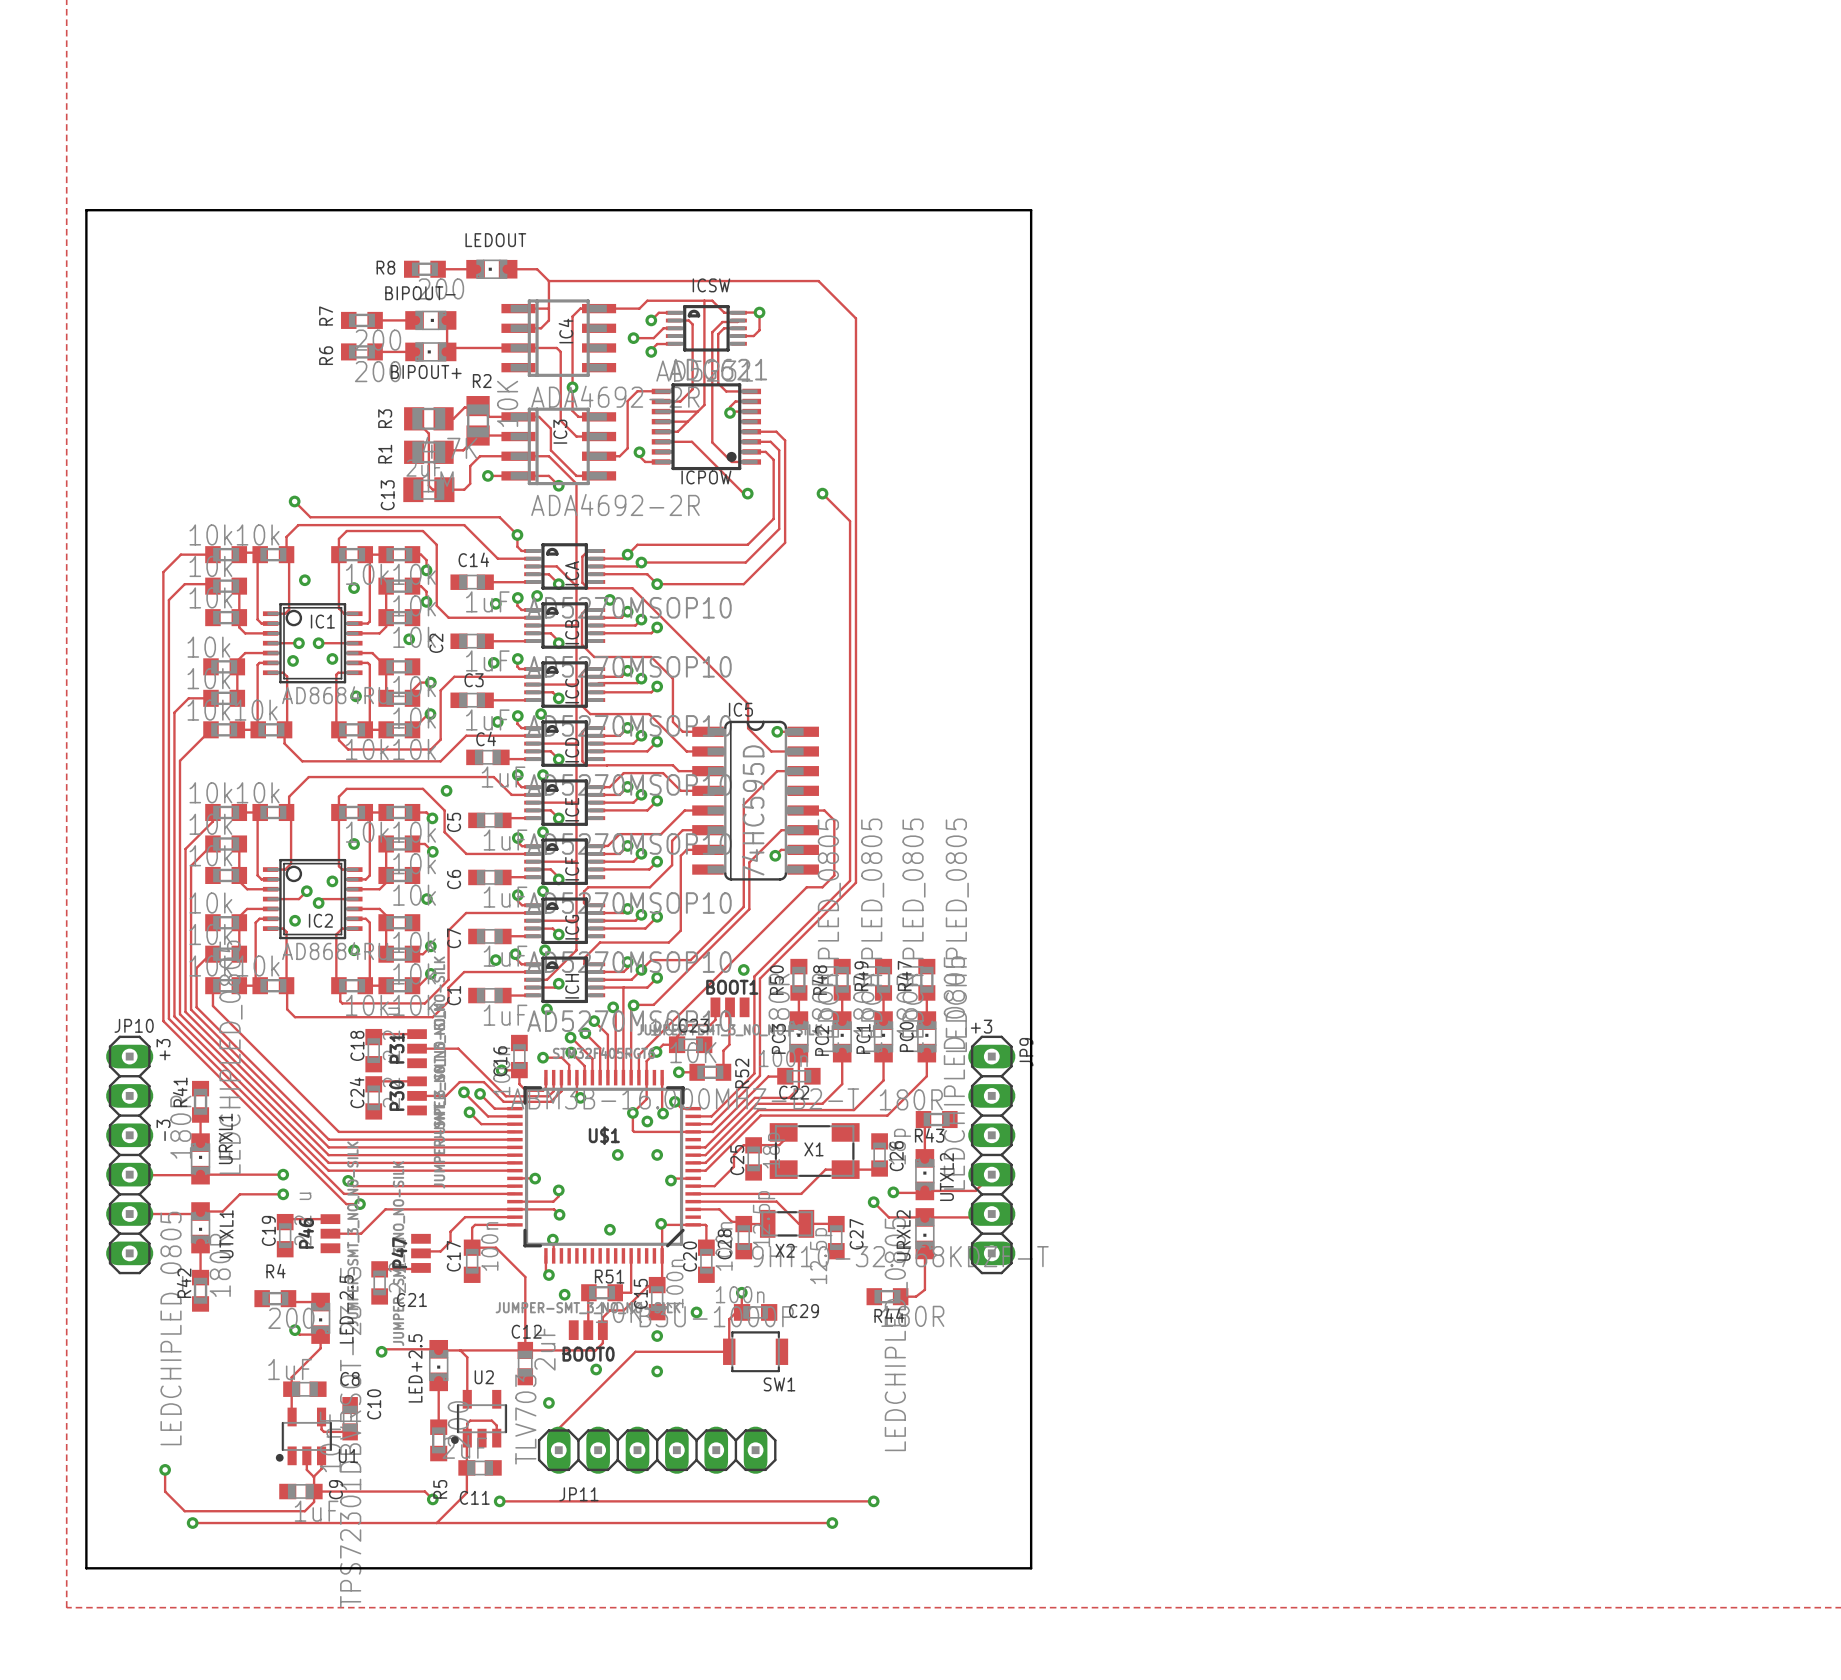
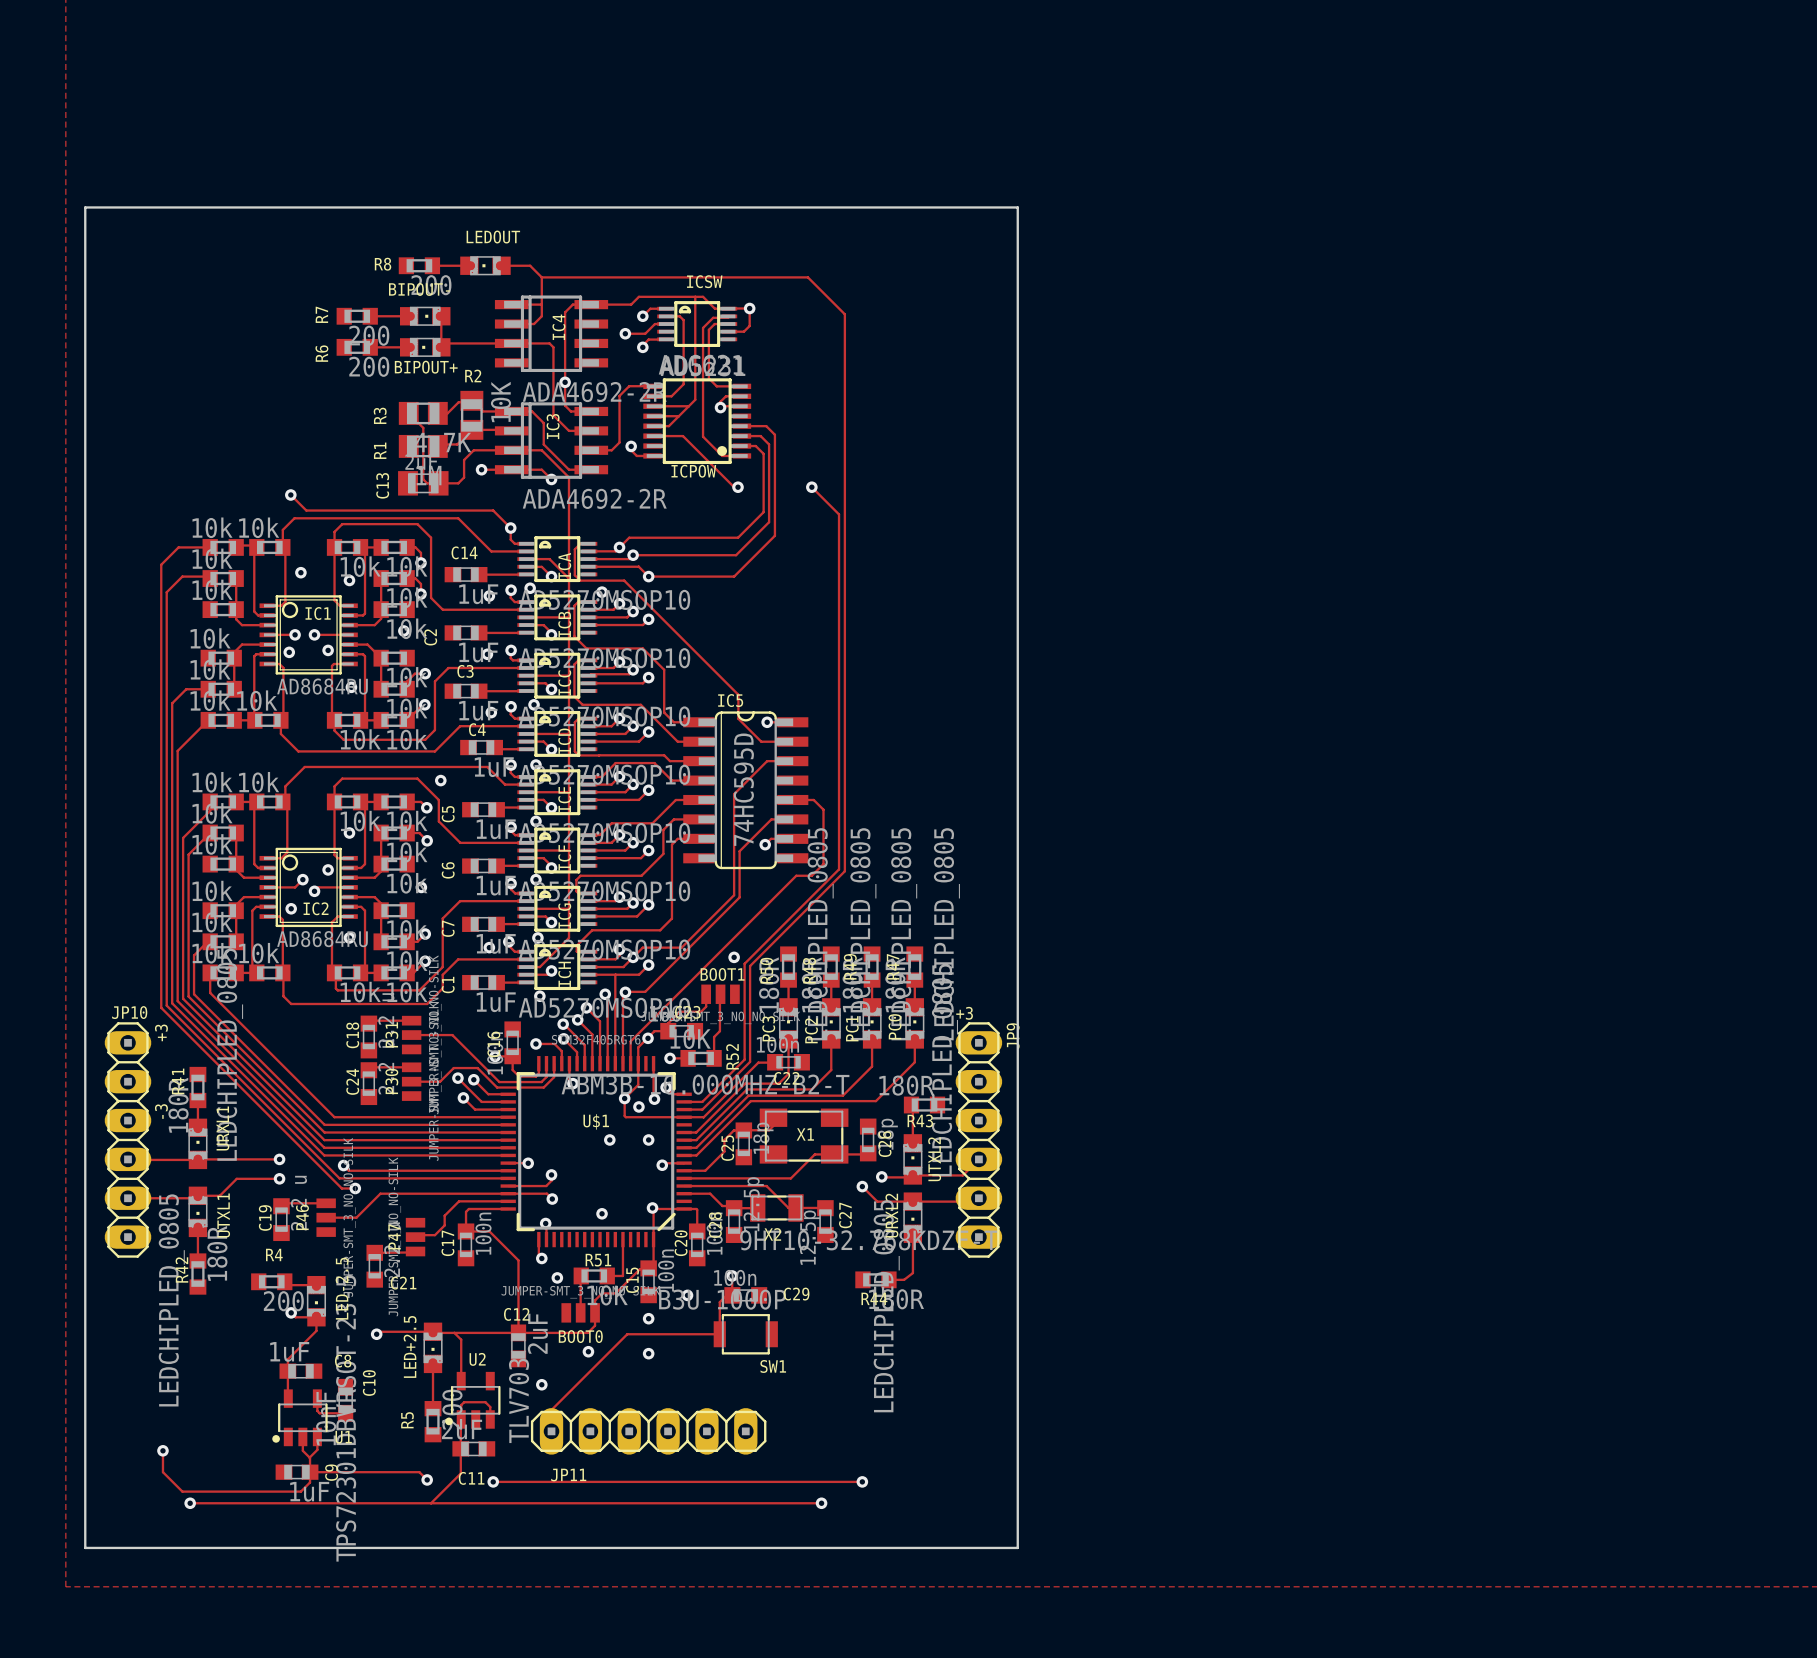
R5 name position: R5 (440, 1489) -> R5 (407, 1420)

